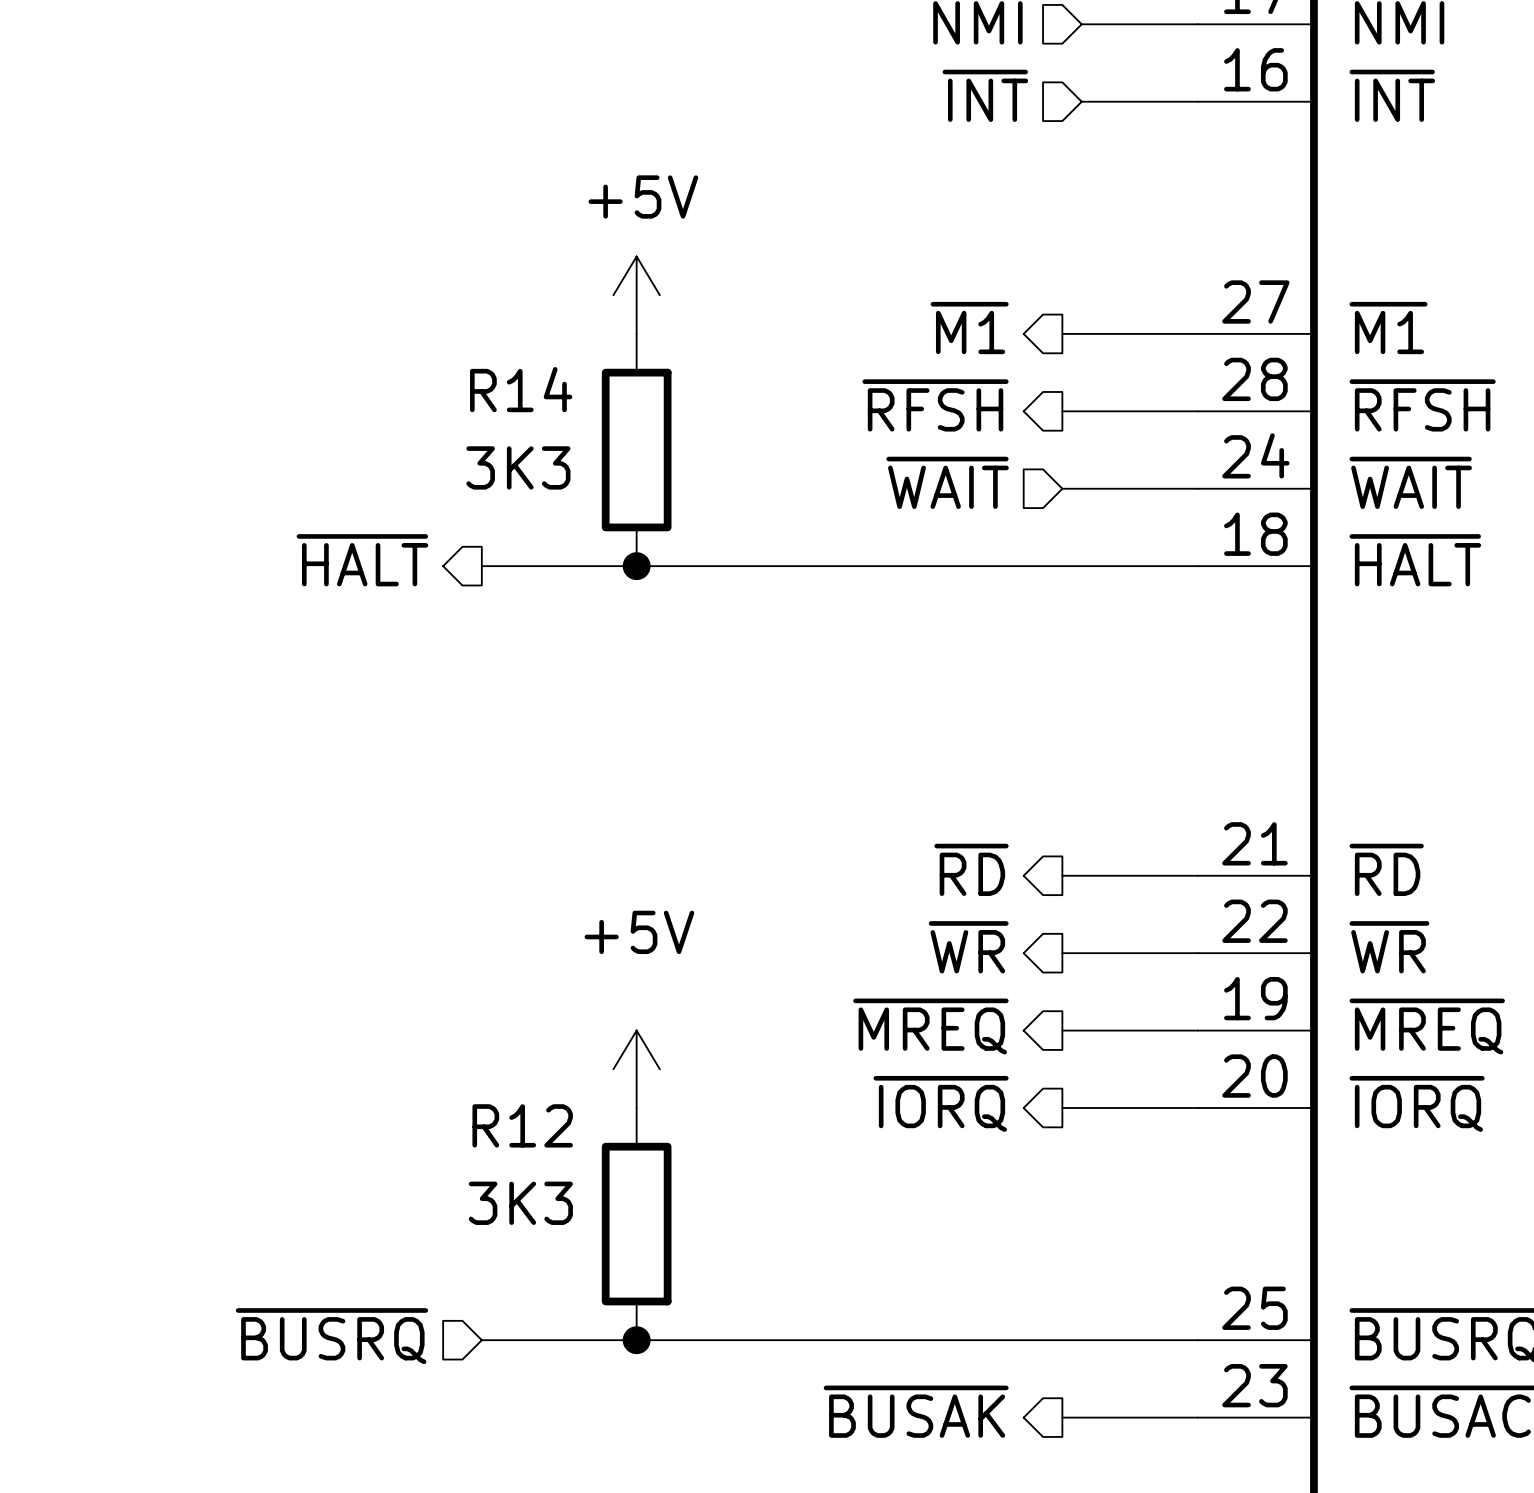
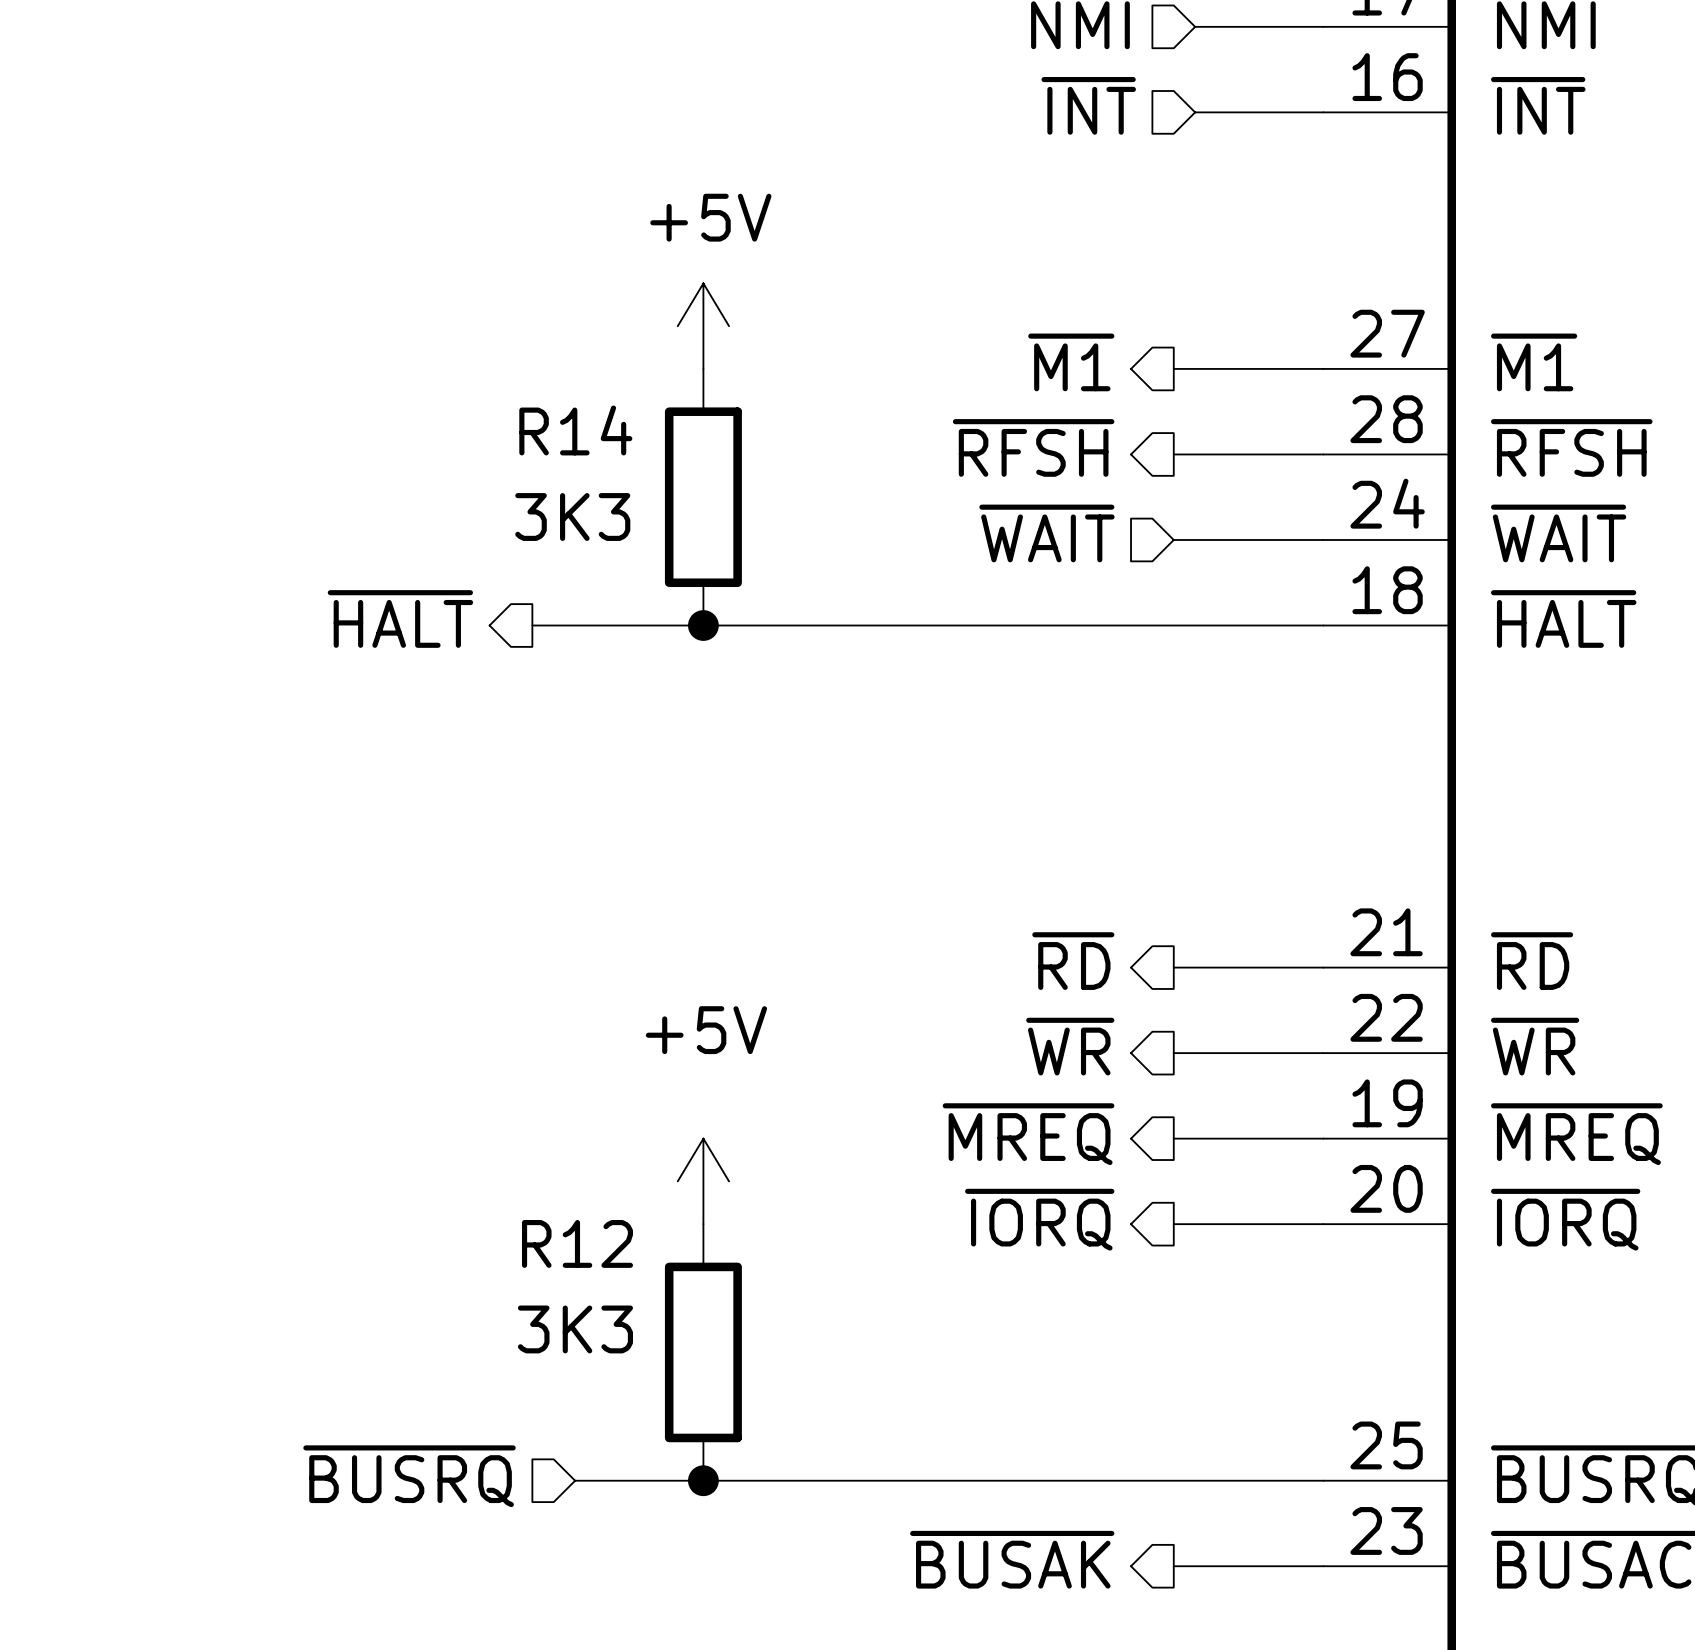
hierarchical label position: ~{BUSRQ} (331, 1336) -> ~{BUSRQ} (409, 1476)
wire: (481, 1340) (520, 1340) -> none

